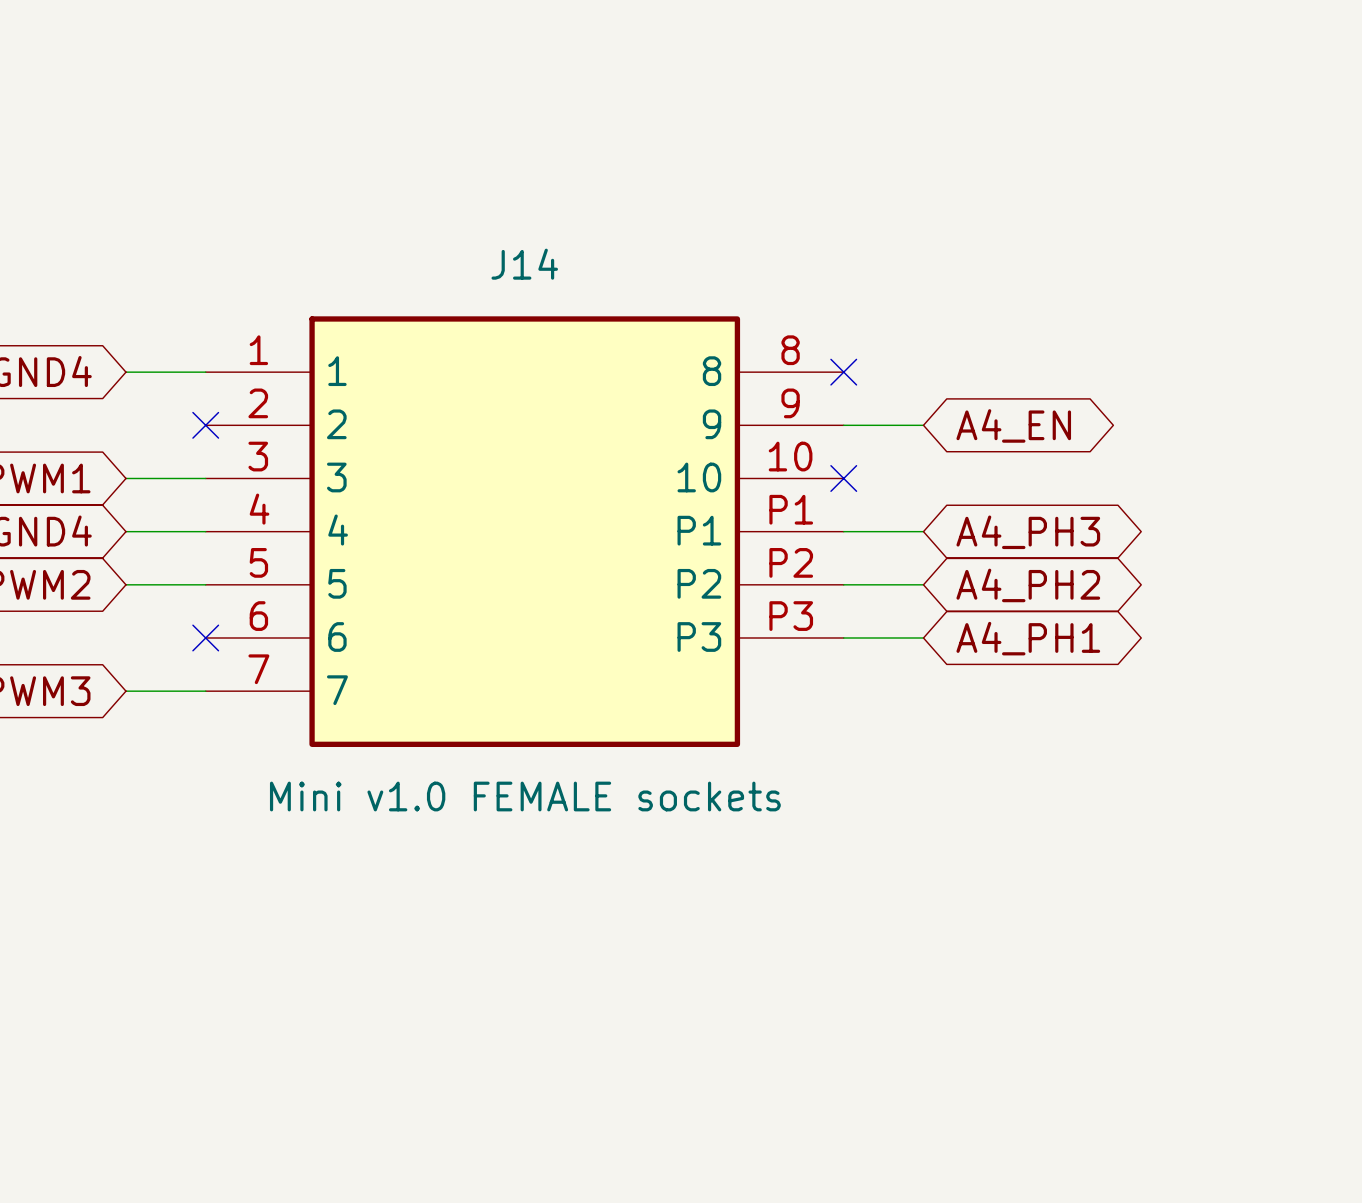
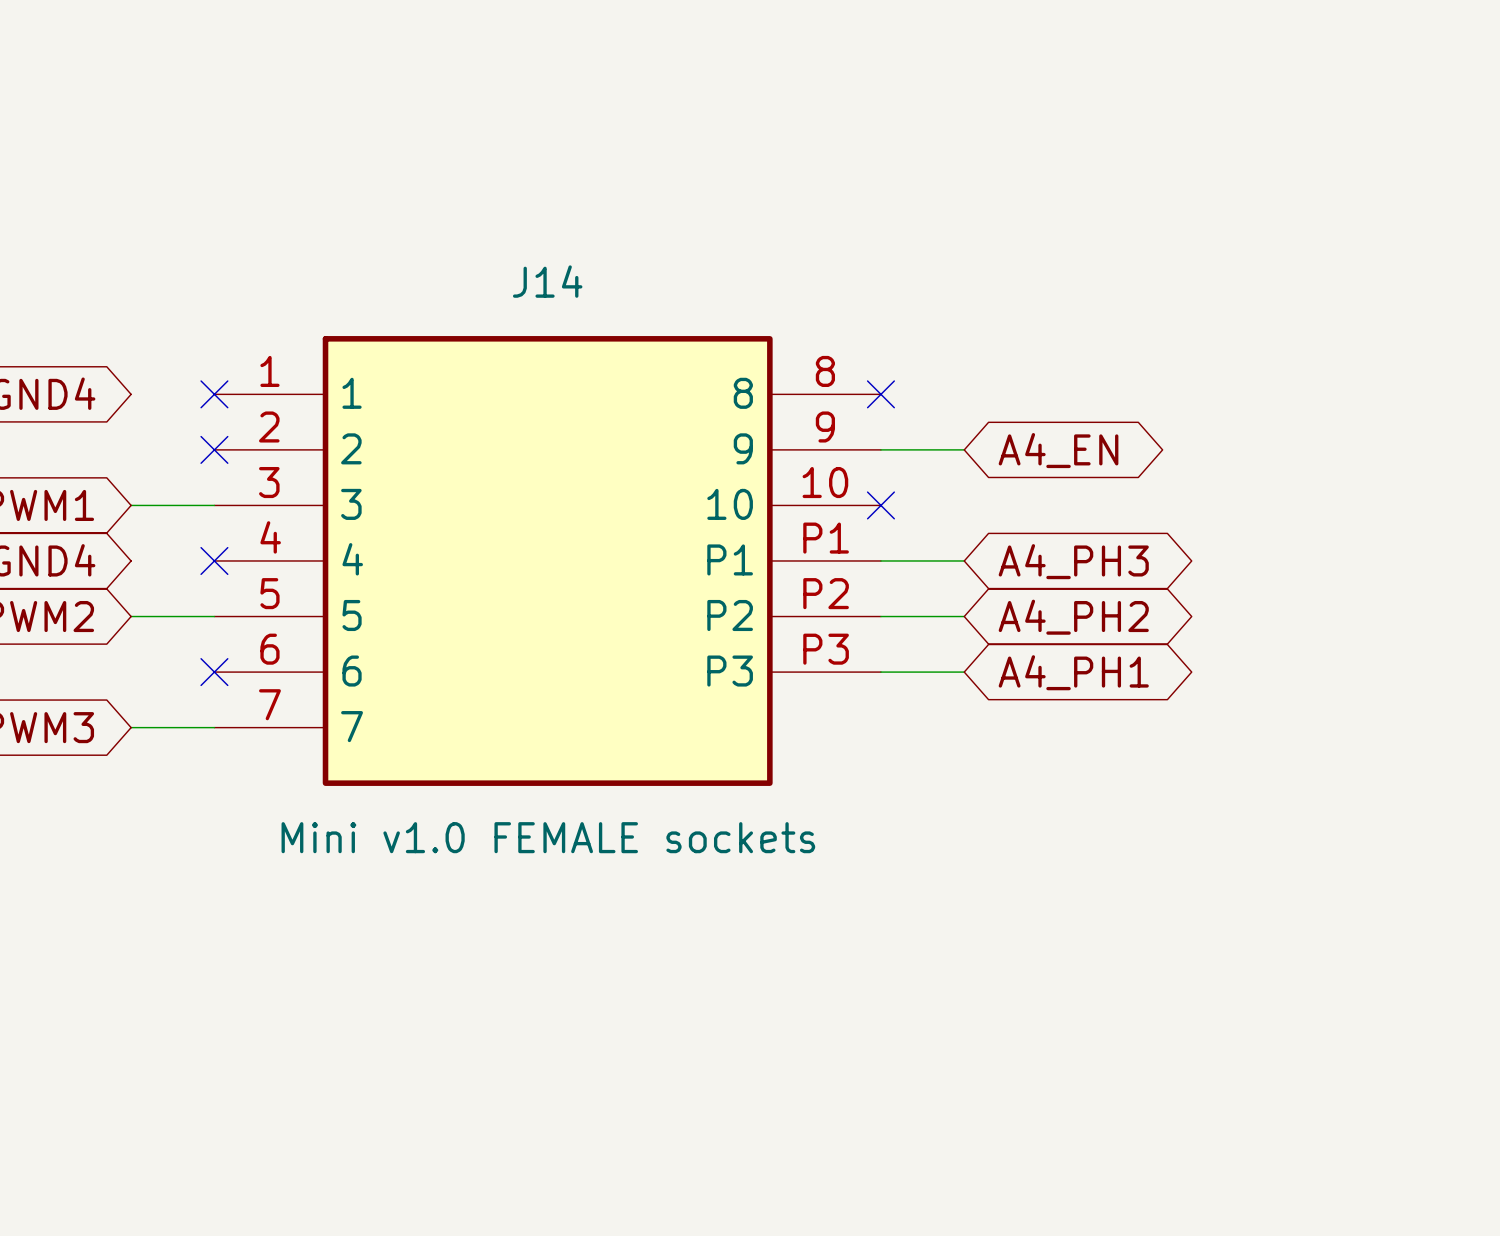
wire: (125, 372) (205, 372) -> none
no-connect mark: none -> (214, 394)
wire: (125, 531) (205, 531) -> none
no-connect mark: none -> (214, 560)

